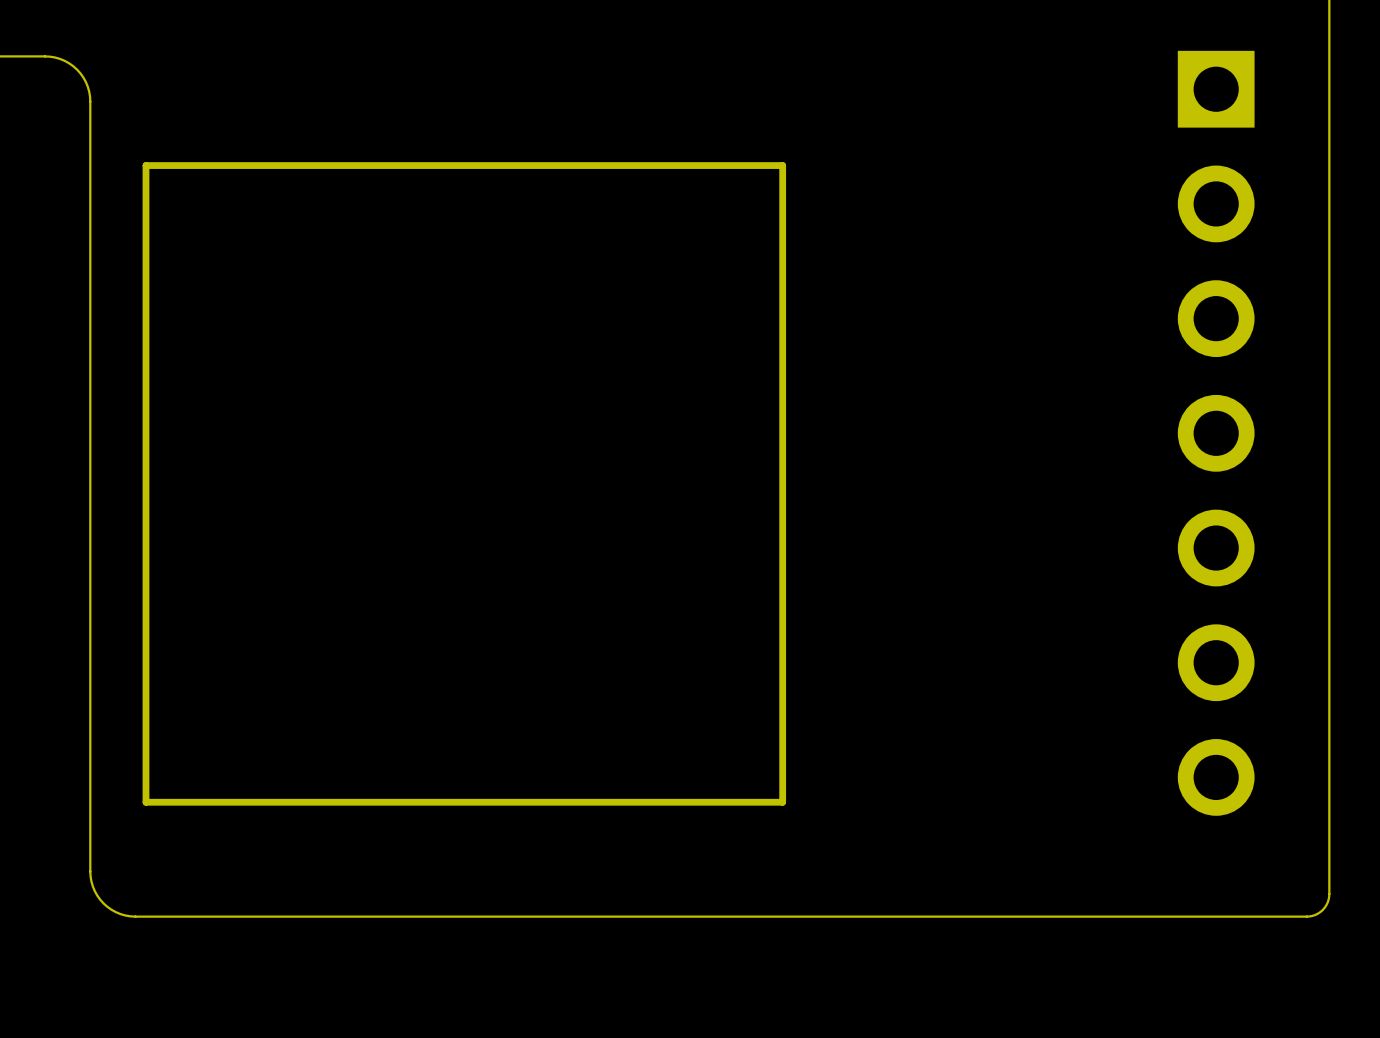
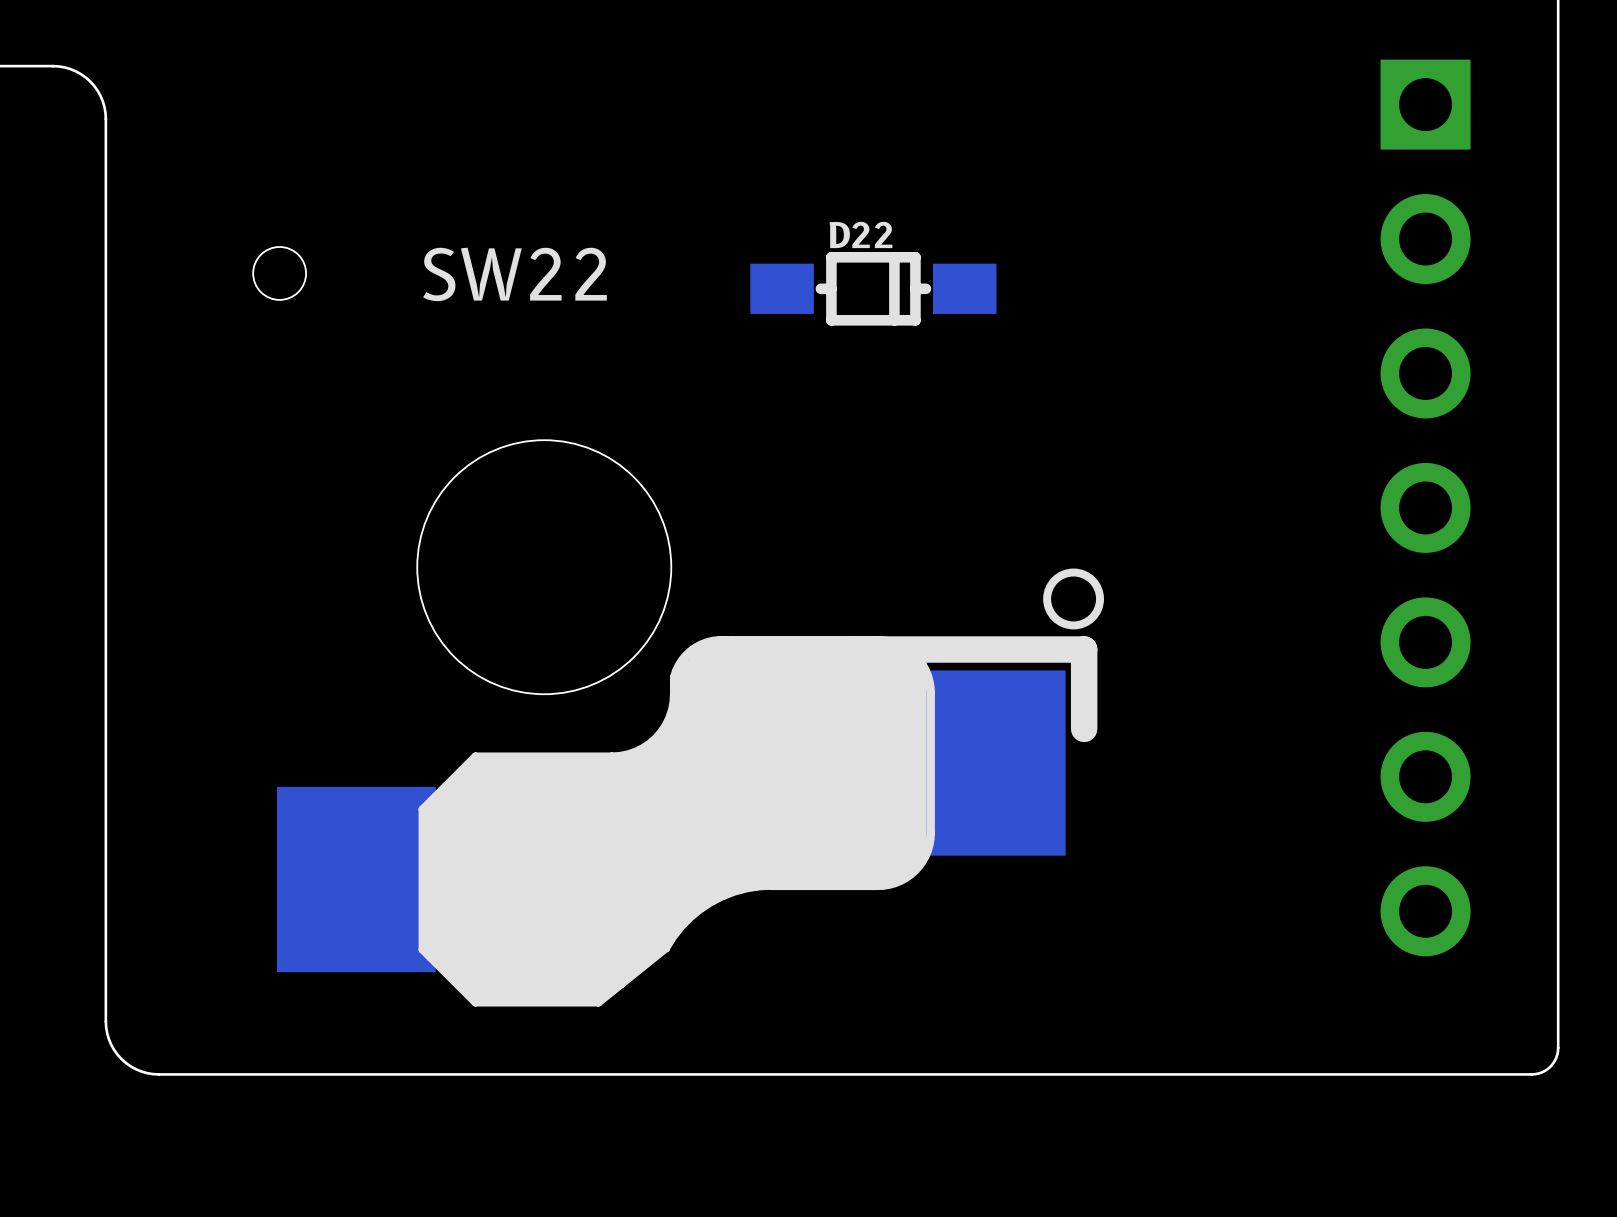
drawing: [142, 162, 787, 806] -> none
D22: none -> (873, 288)
SW22: none -> (678, 626)

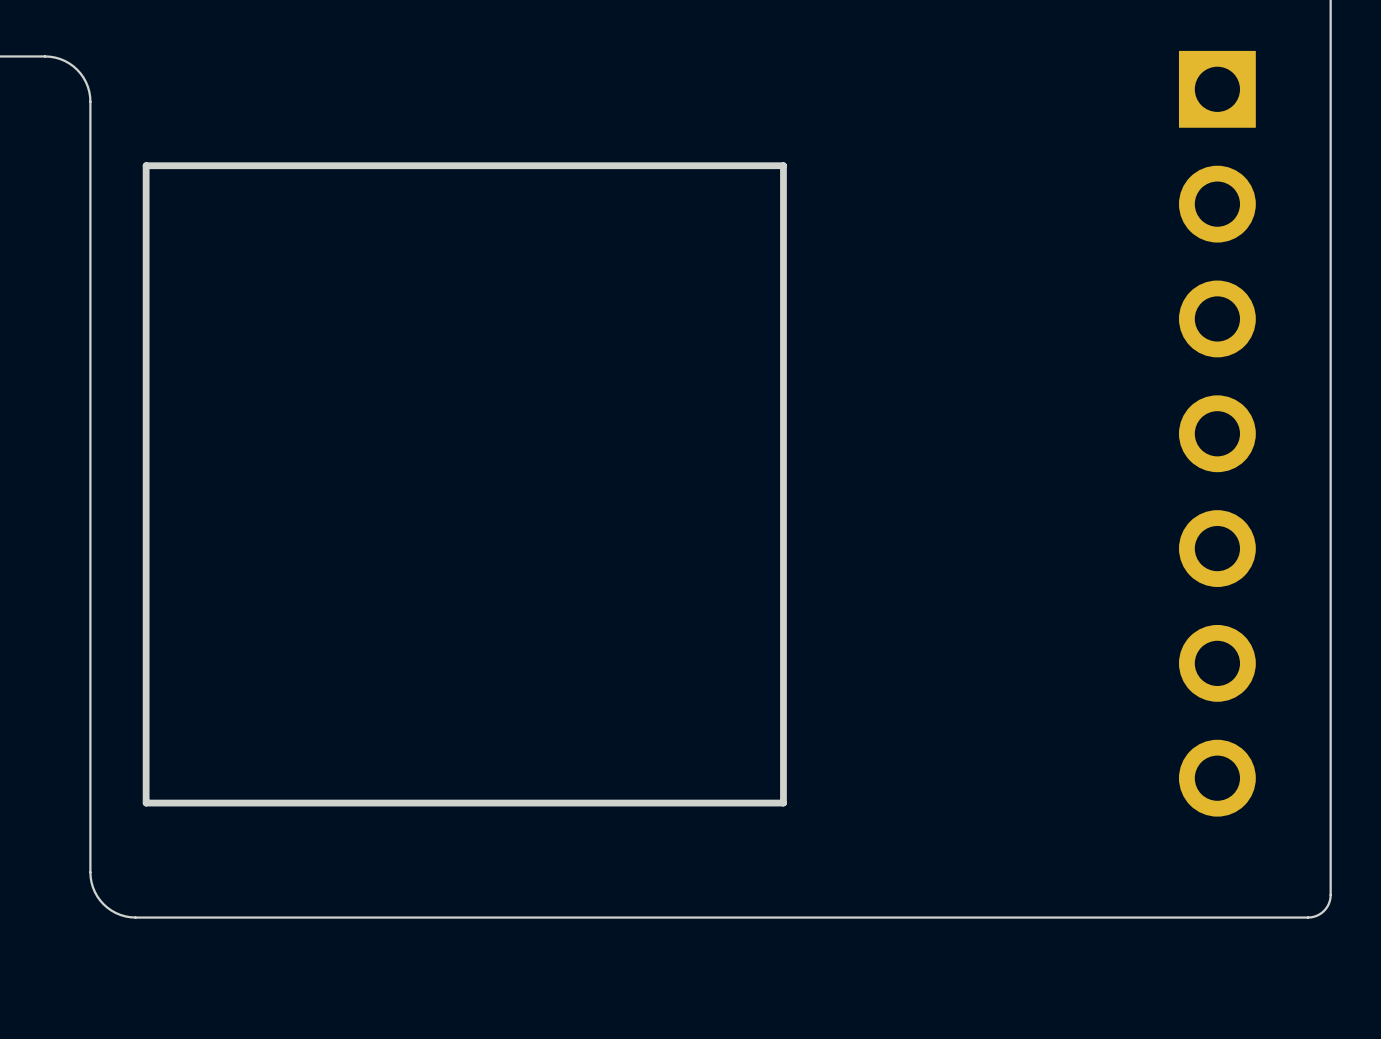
drawing: none -> [142, 162, 787, 807]
D22: (873, 288) -> none
SW22: (678, 626) -> none

